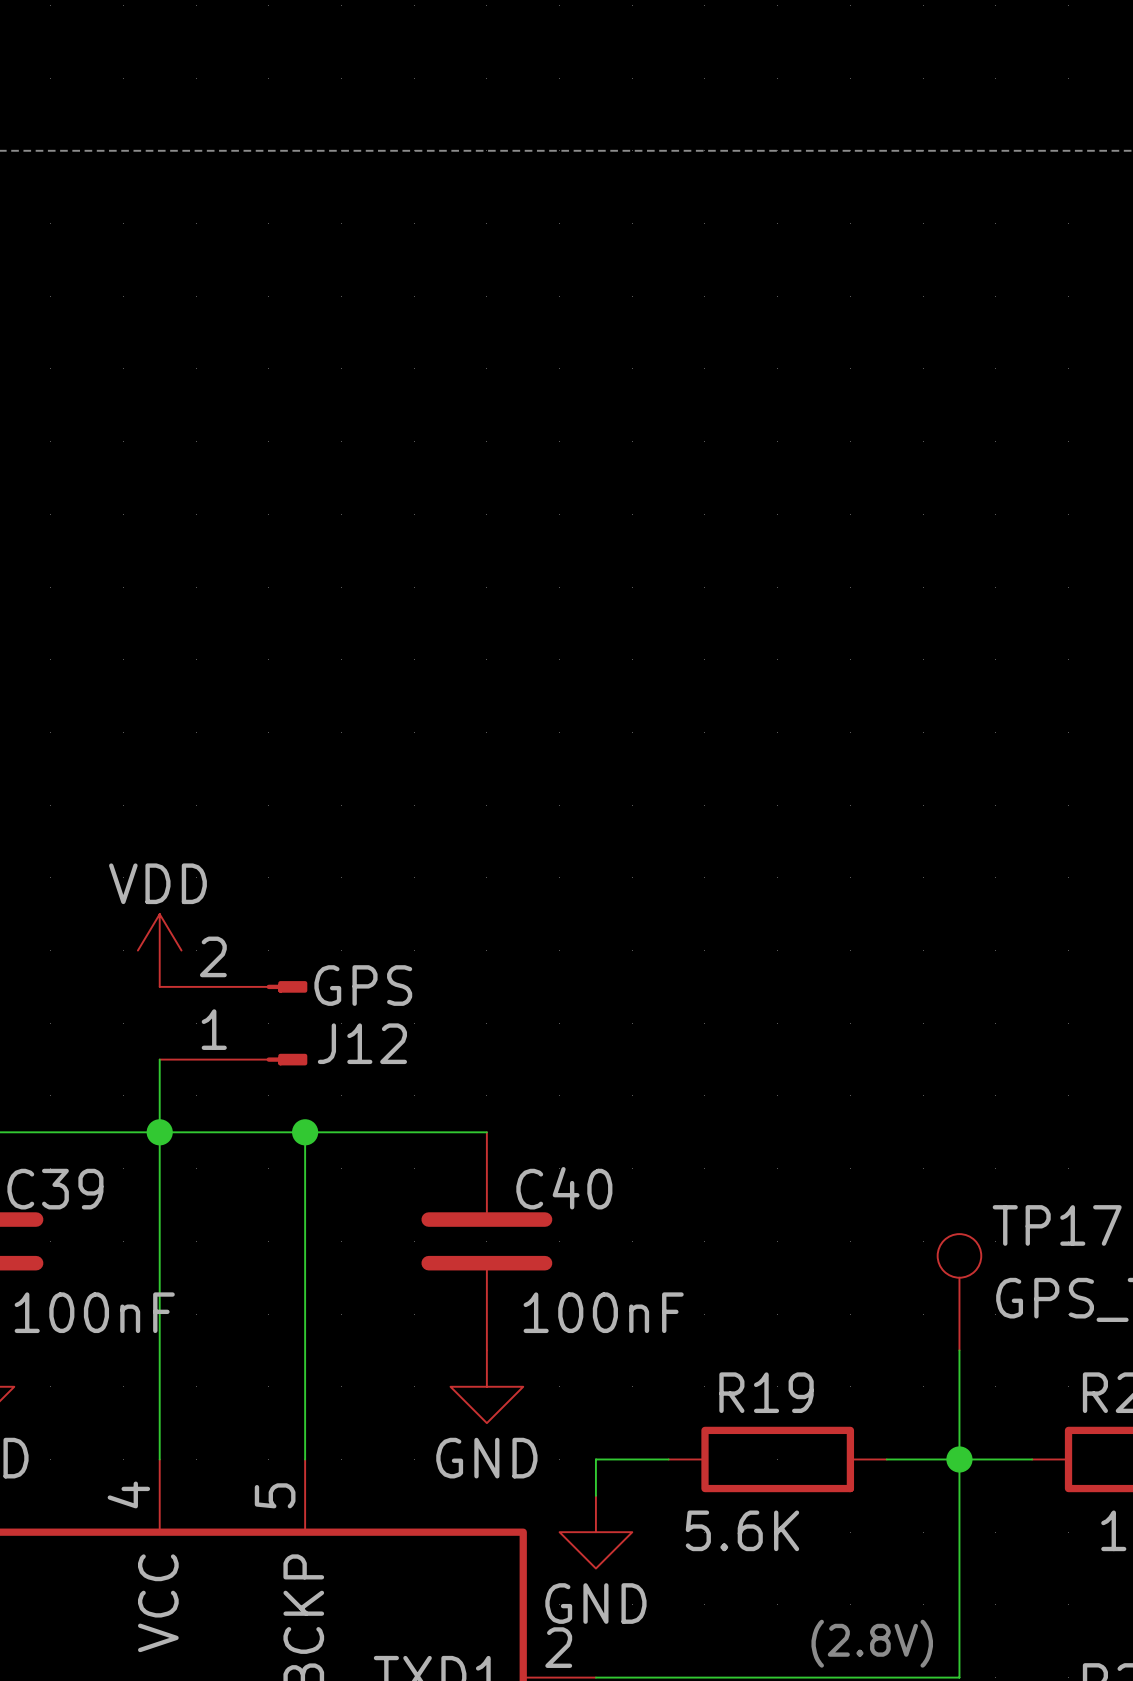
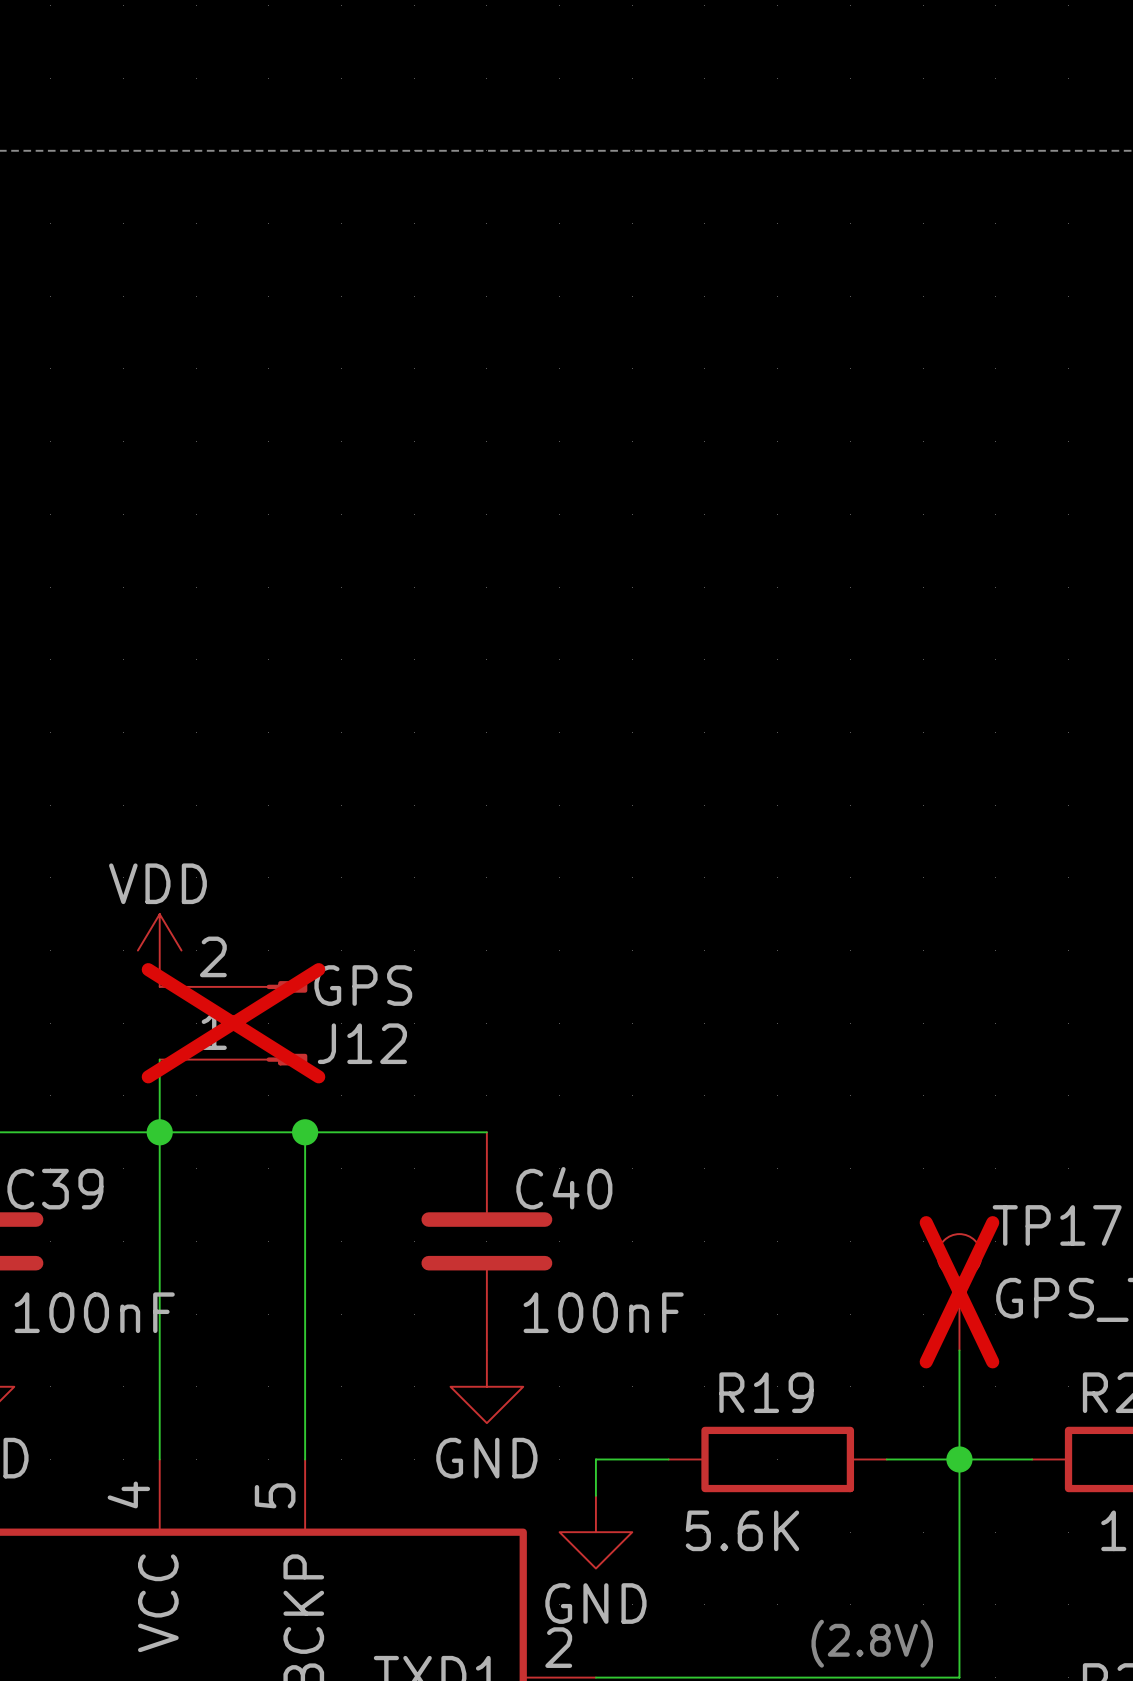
J12 do-not-place cross: none -> (233, 1023)
TP17 do-not-place cross: none -> (959, 1292)

